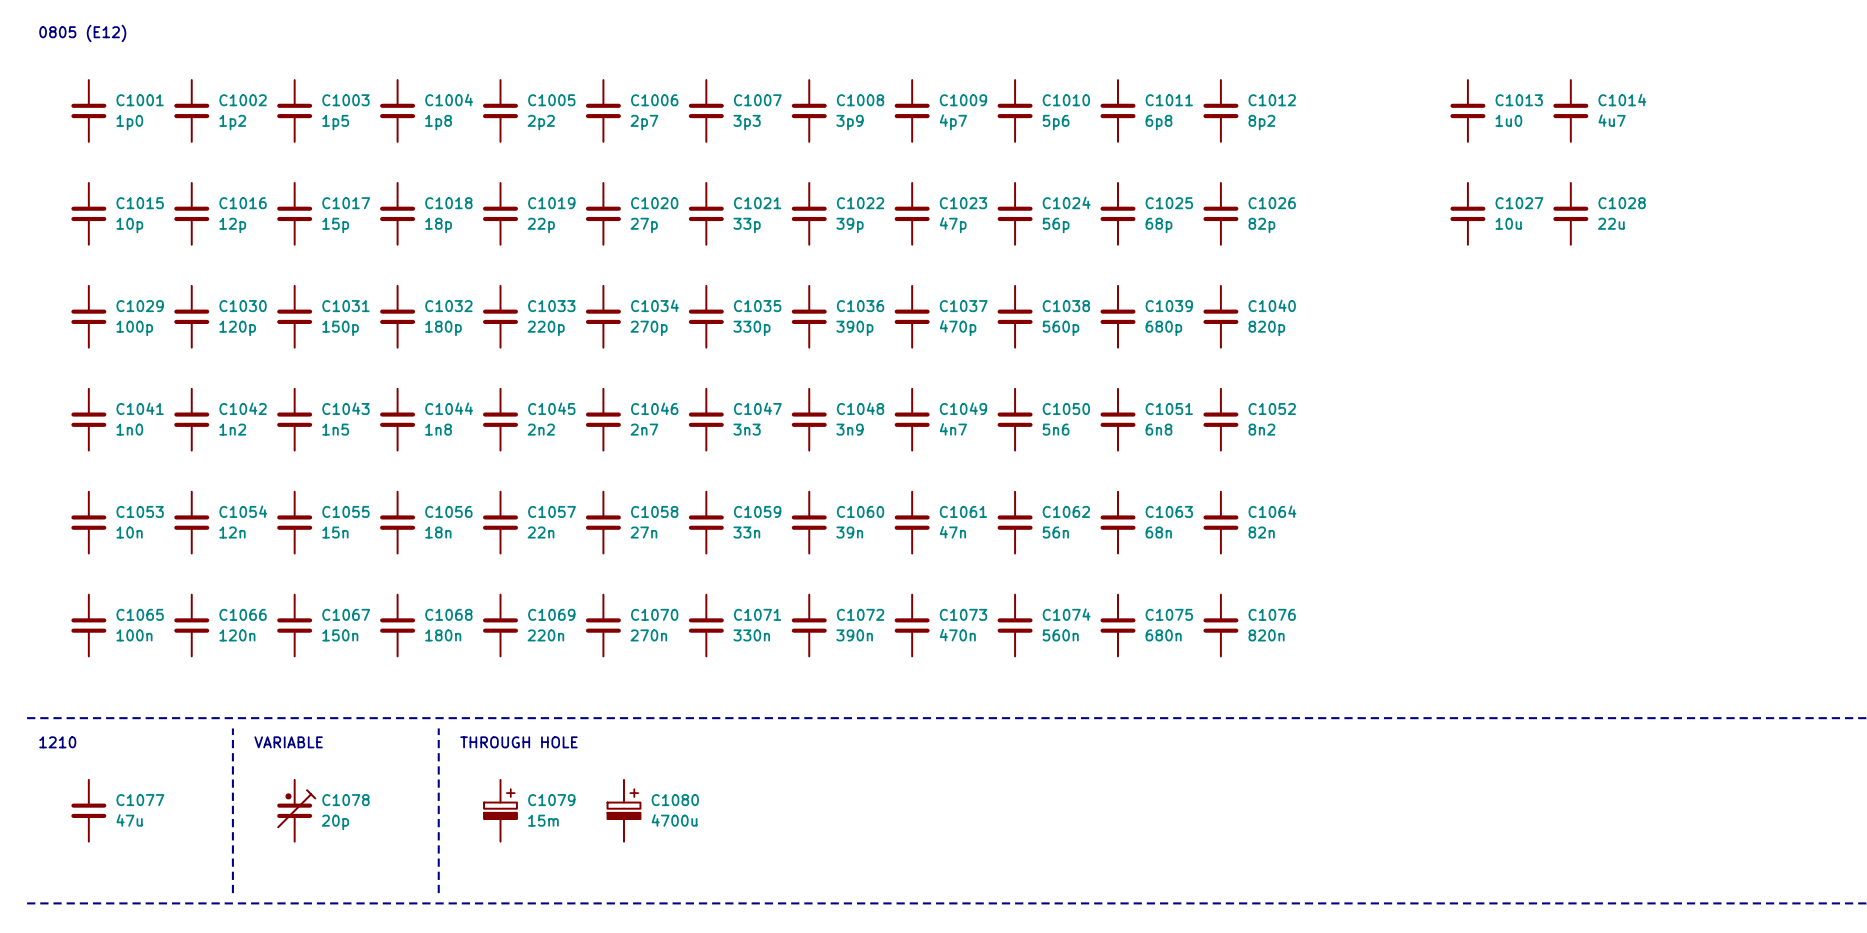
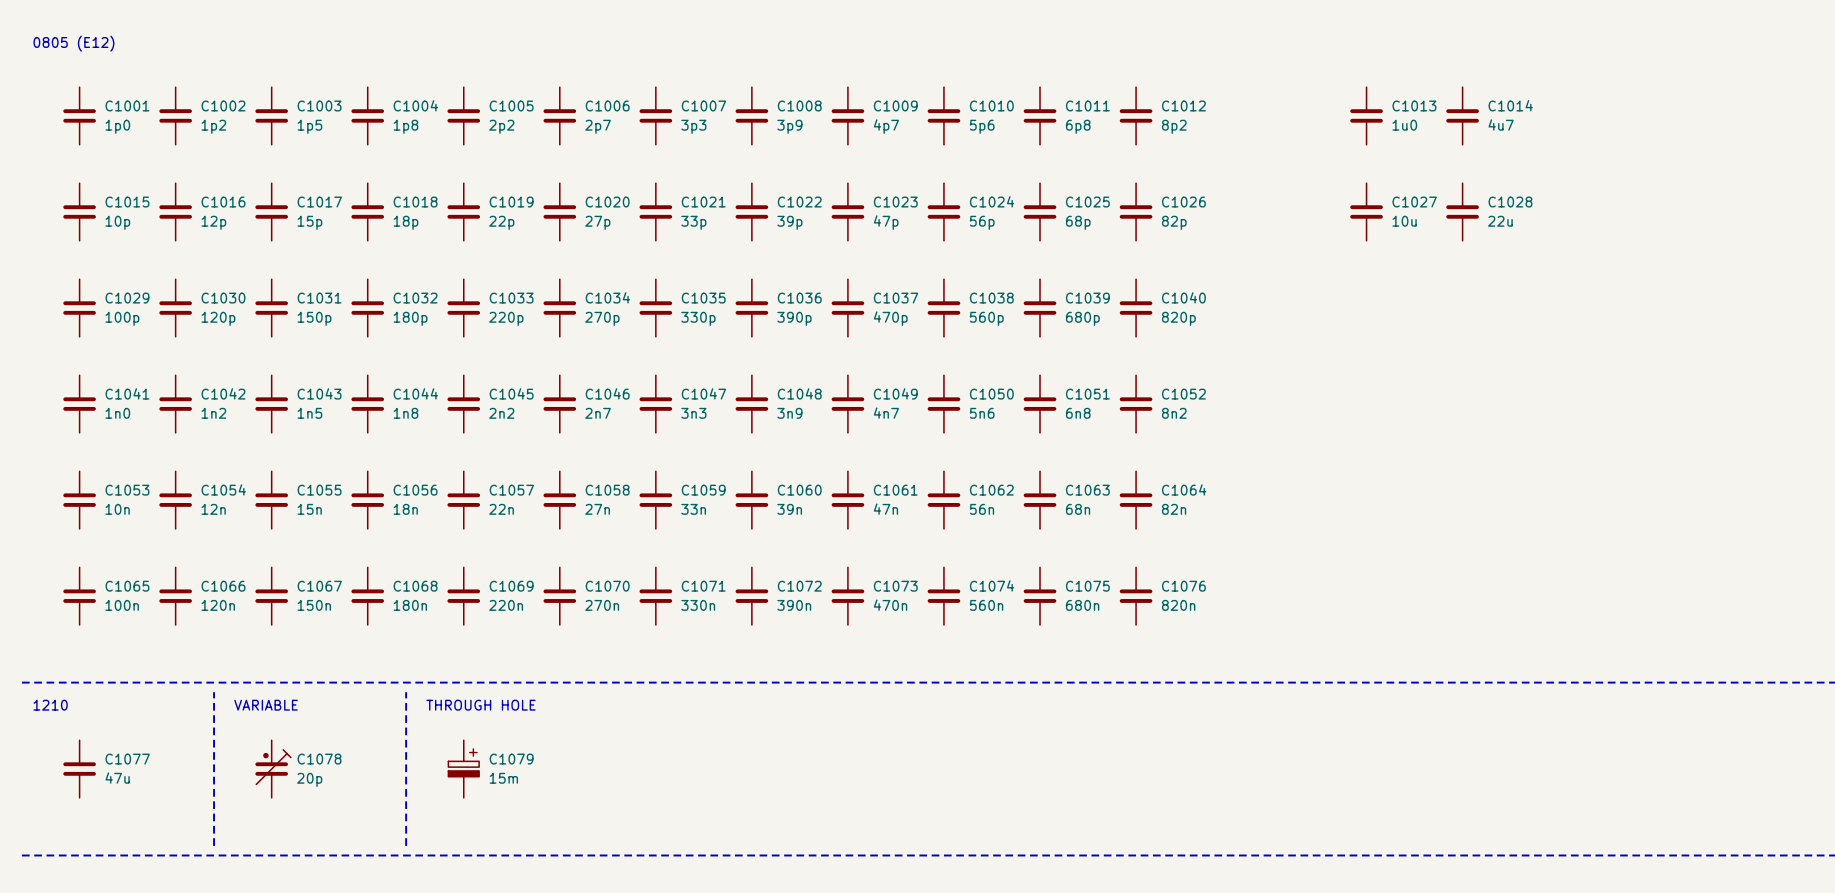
C1080: 4700u (624, 810) -> none

